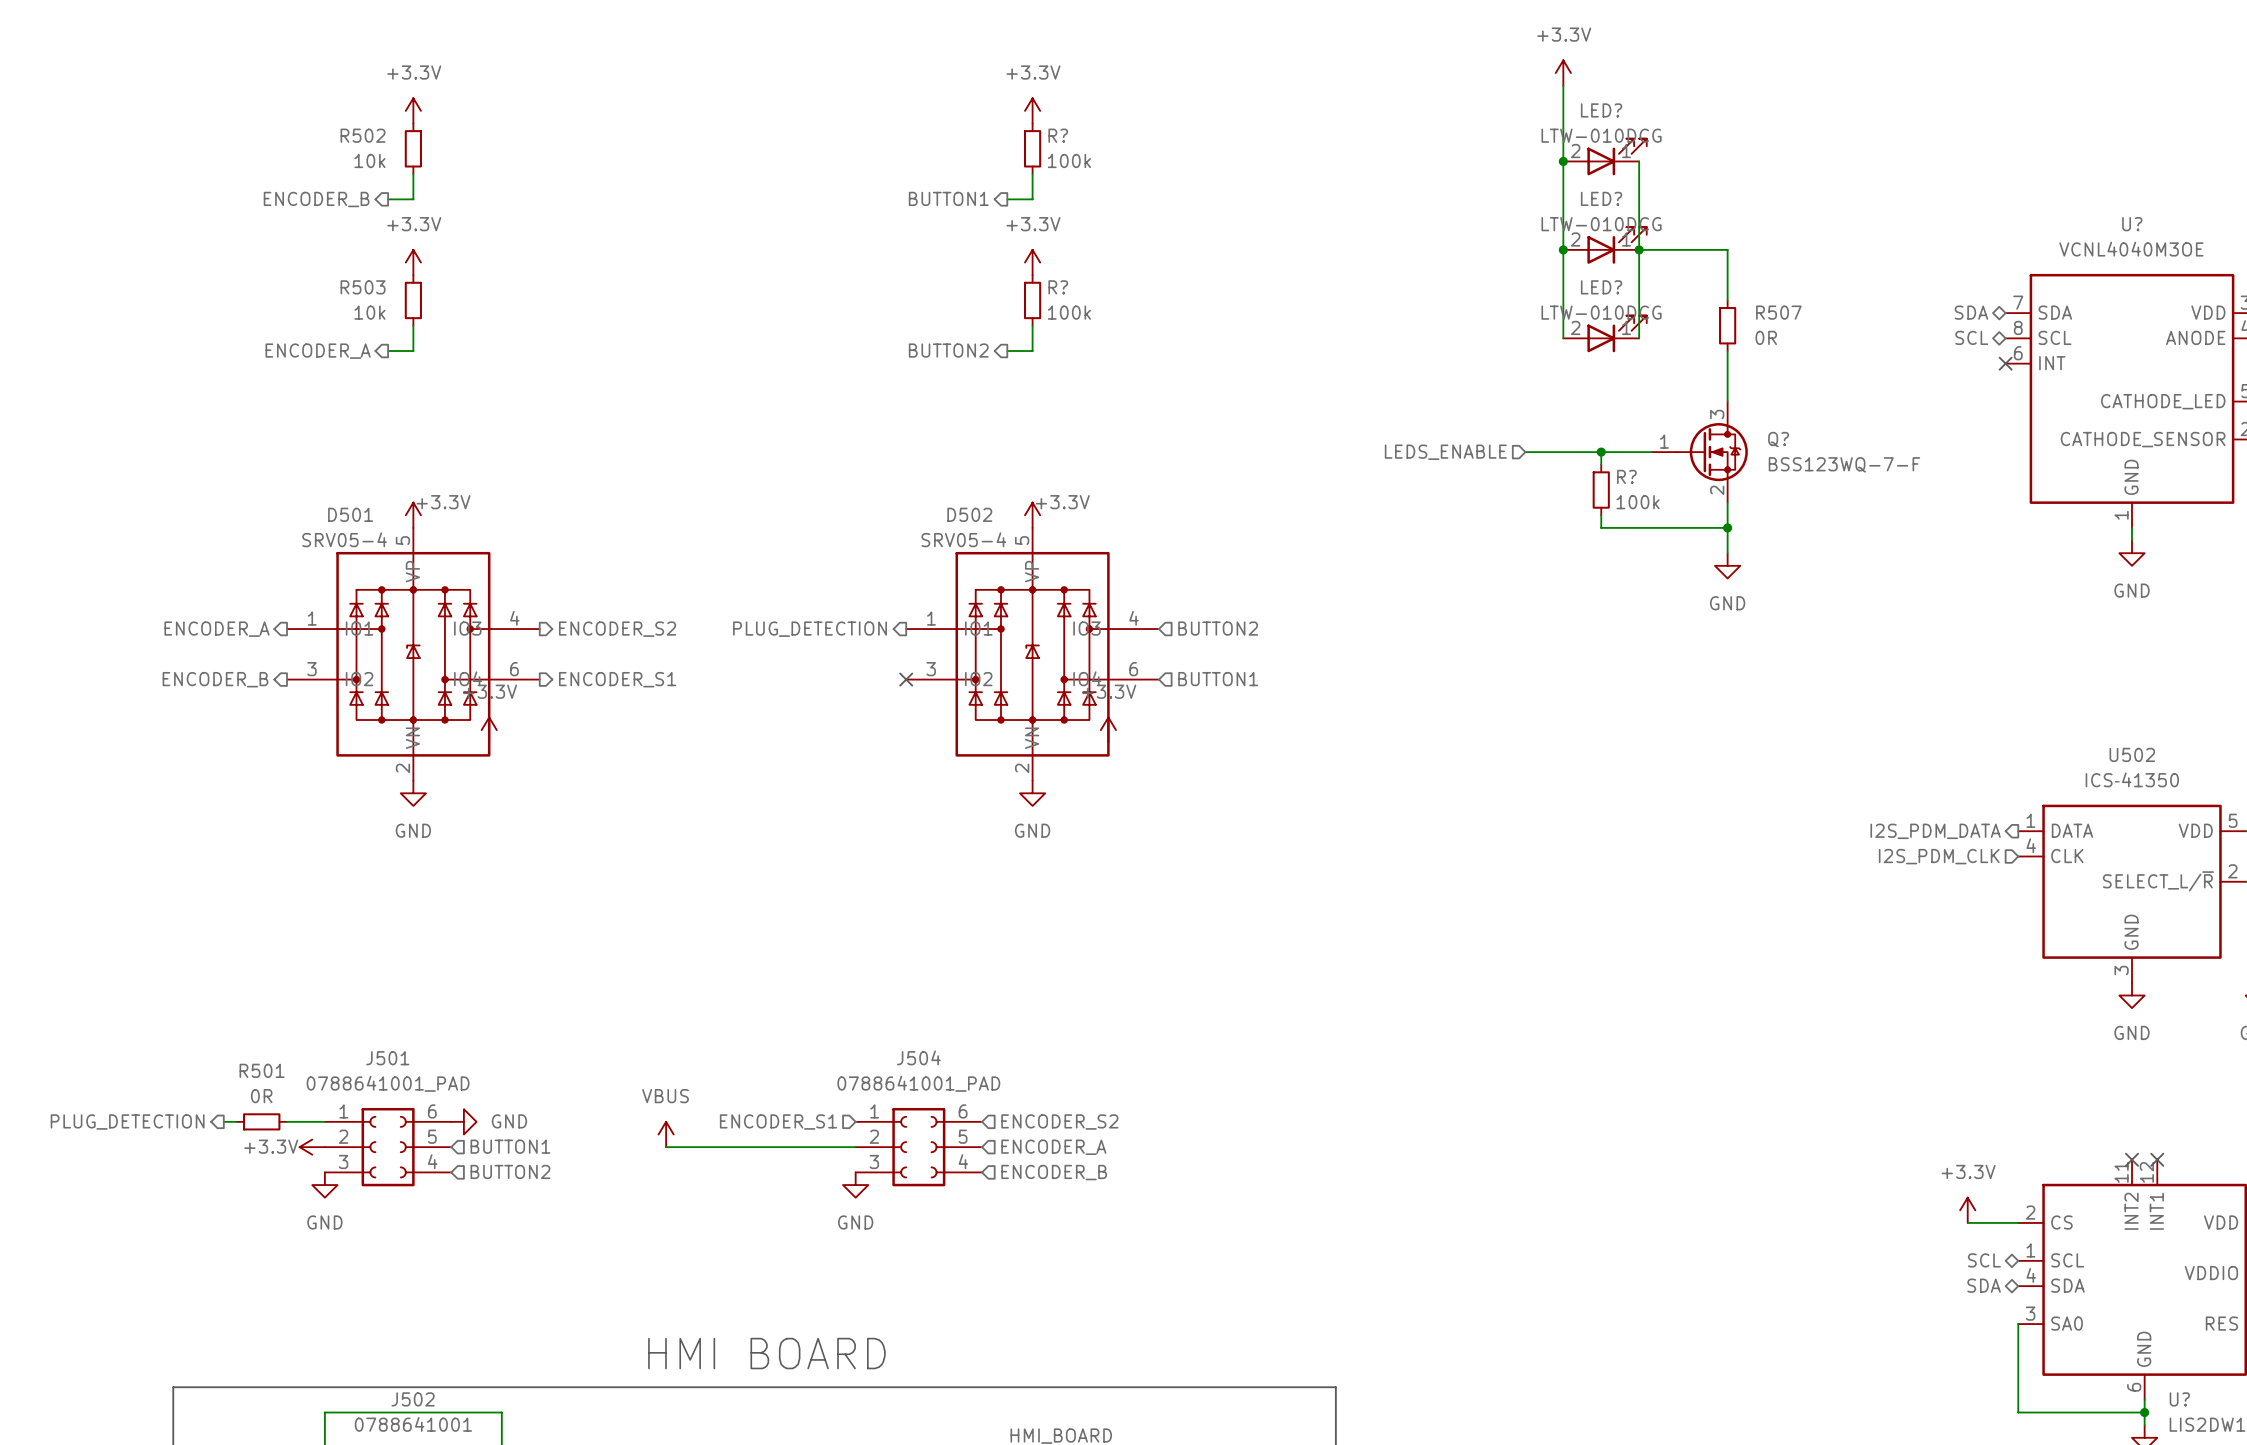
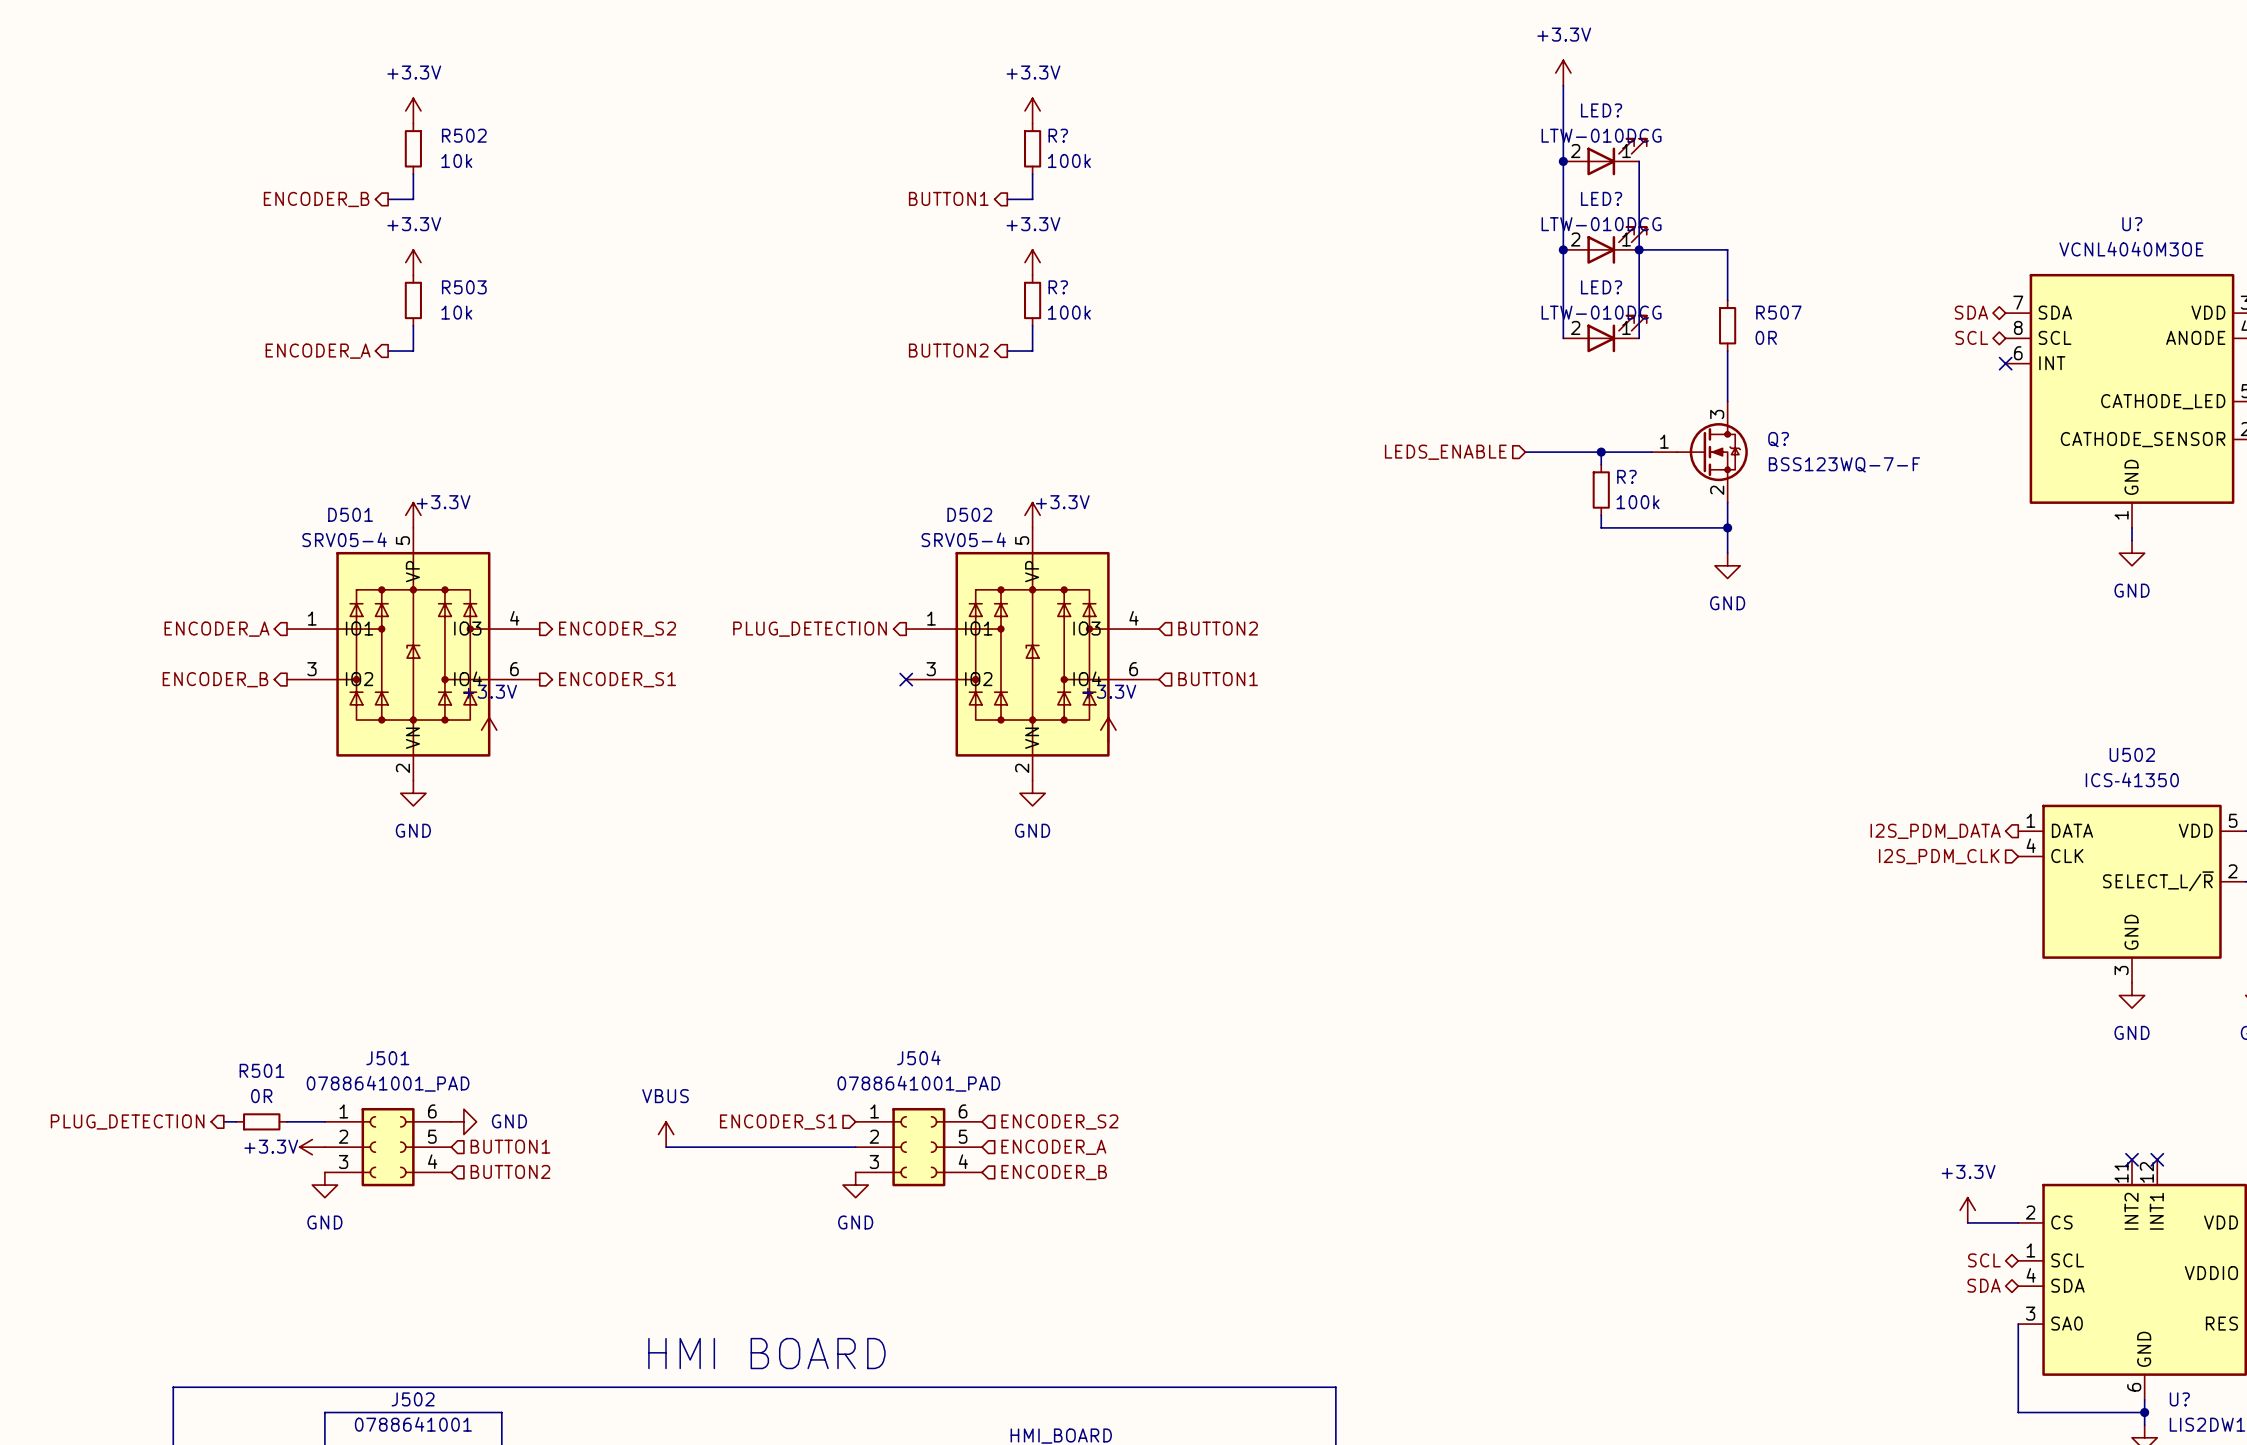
R502 name position: R502 (363, 135) -> R502 (464, 135)
R502 text position: 10k (369, 160) -> 10k (456, 160)
R503 name position: R503 (363, 287) -> R503 (464, 287)
R503 text position: 10k (369, 312) -> 10k (456, 312)

